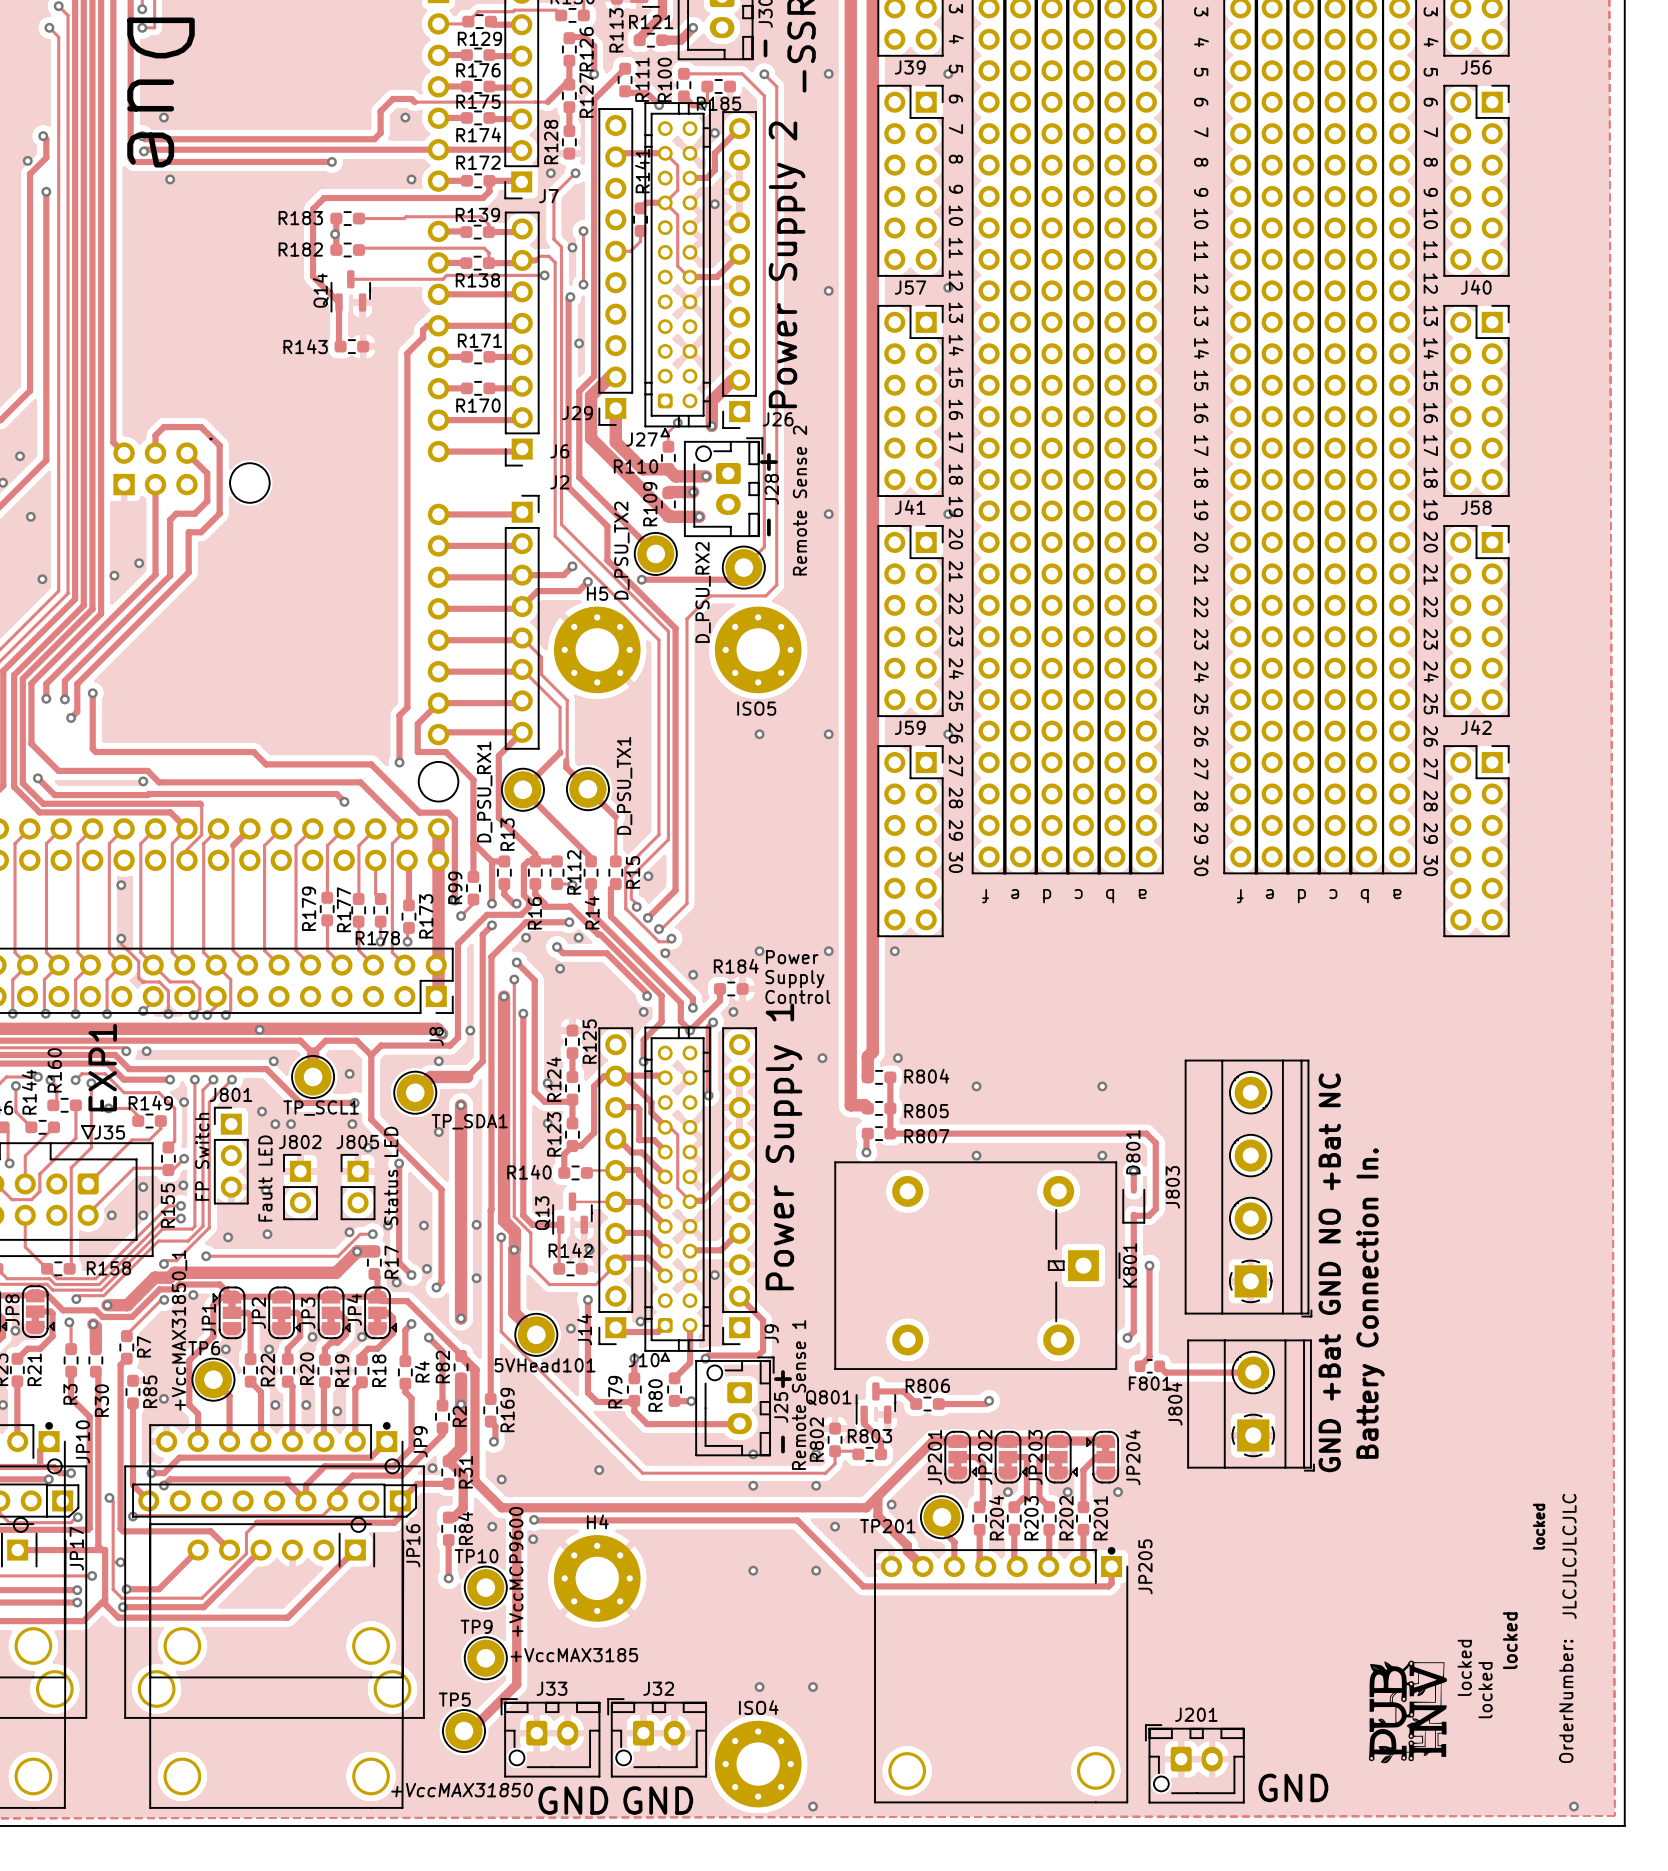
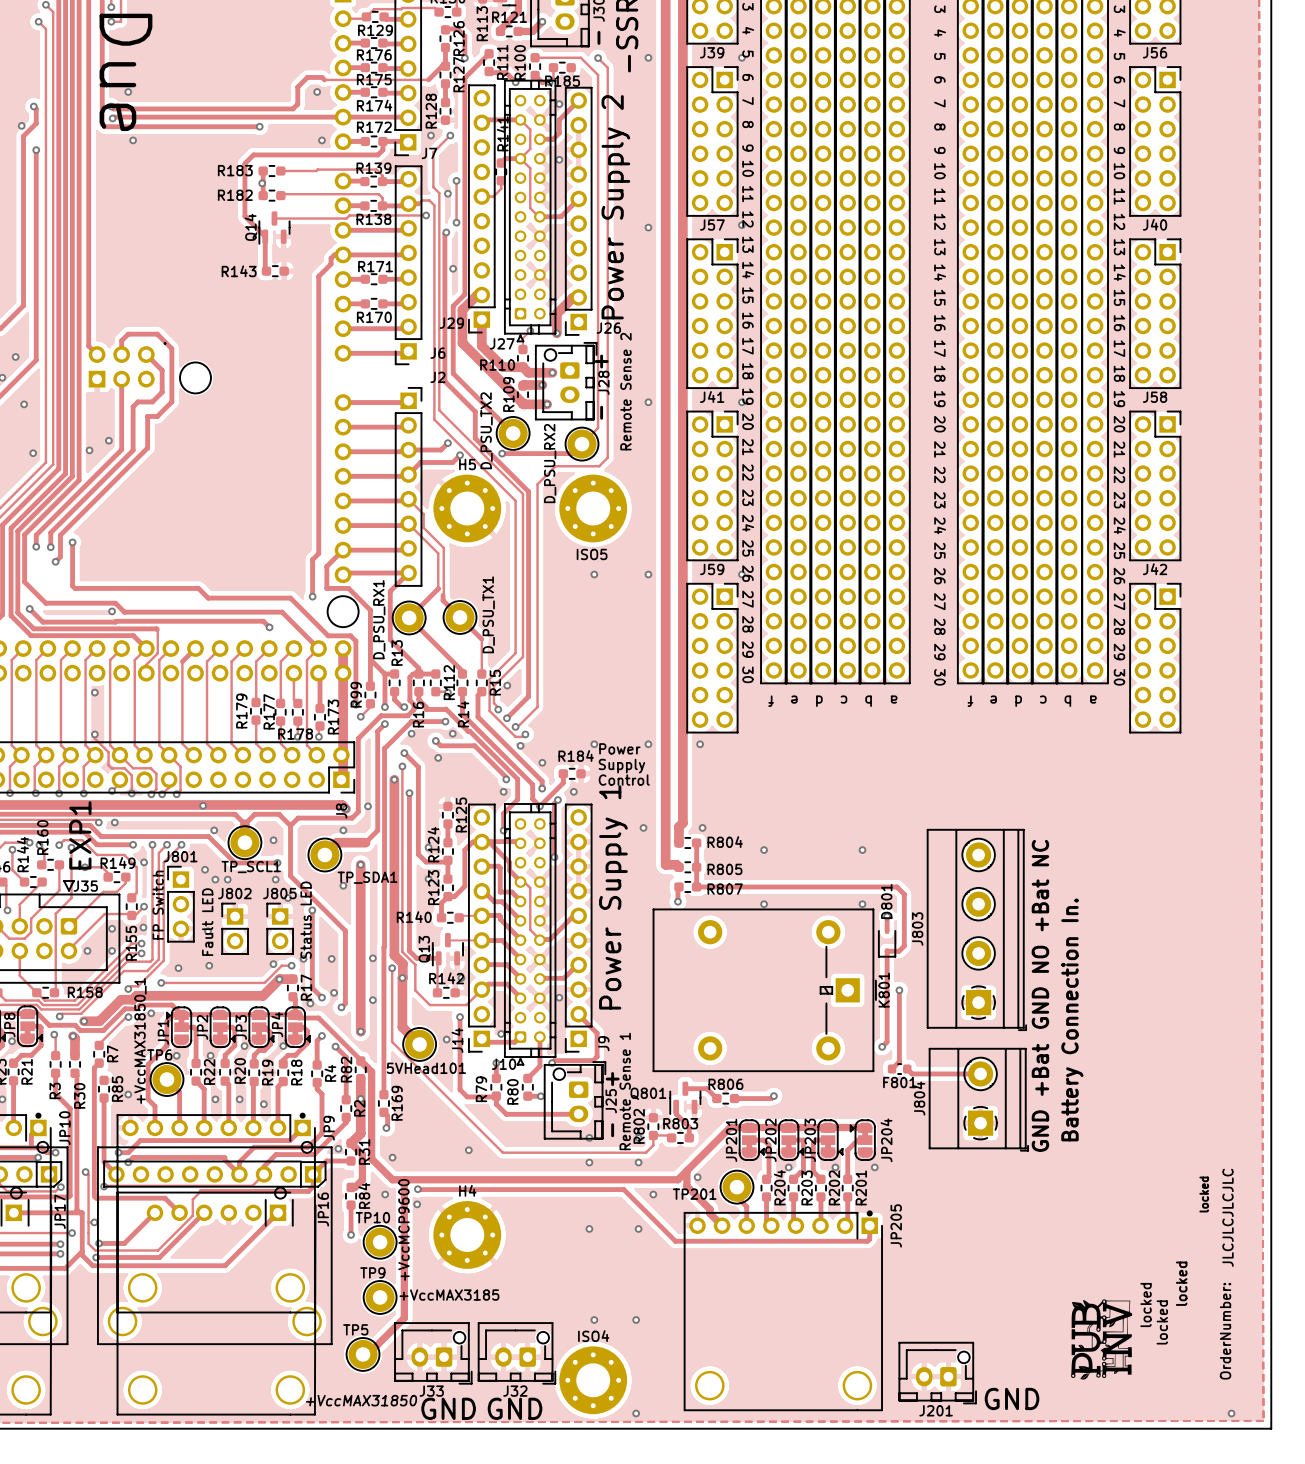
J33 rotation: 0° (550, 1737) -> 180° (433, 1353)
J32 rotation: 0° (657, 1737) -> 180° (516, 1353)
J201 rotation: 0° (1194, 1763) -> 180° (937, 1373)

